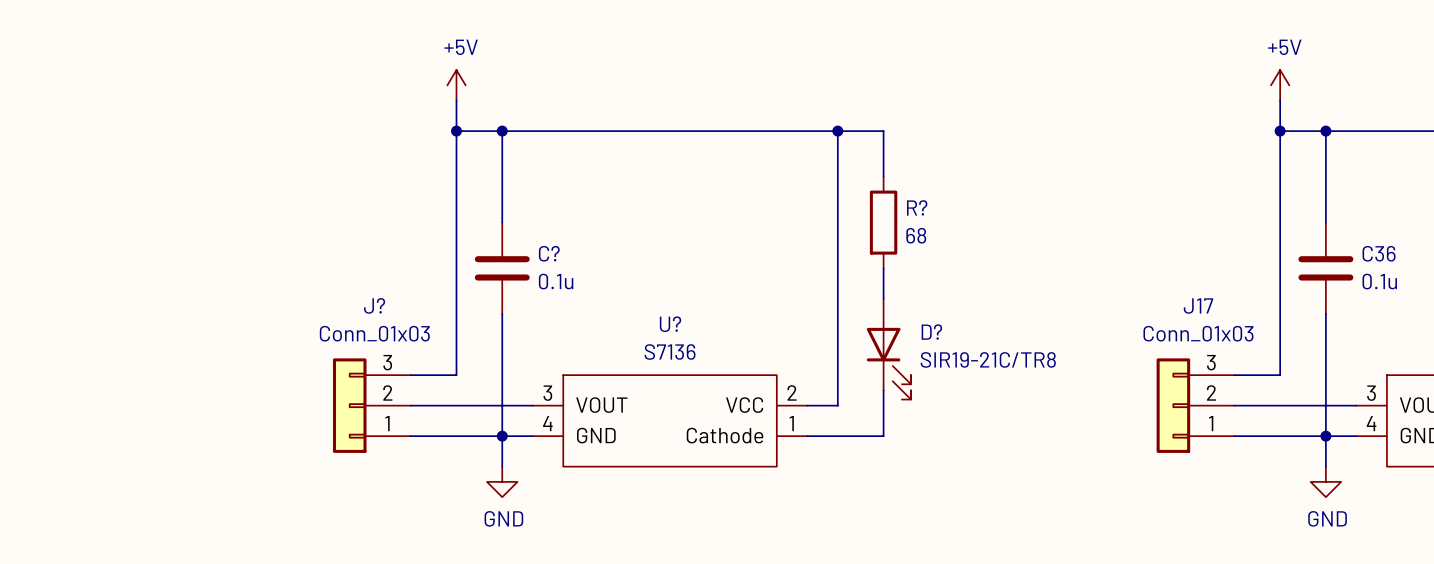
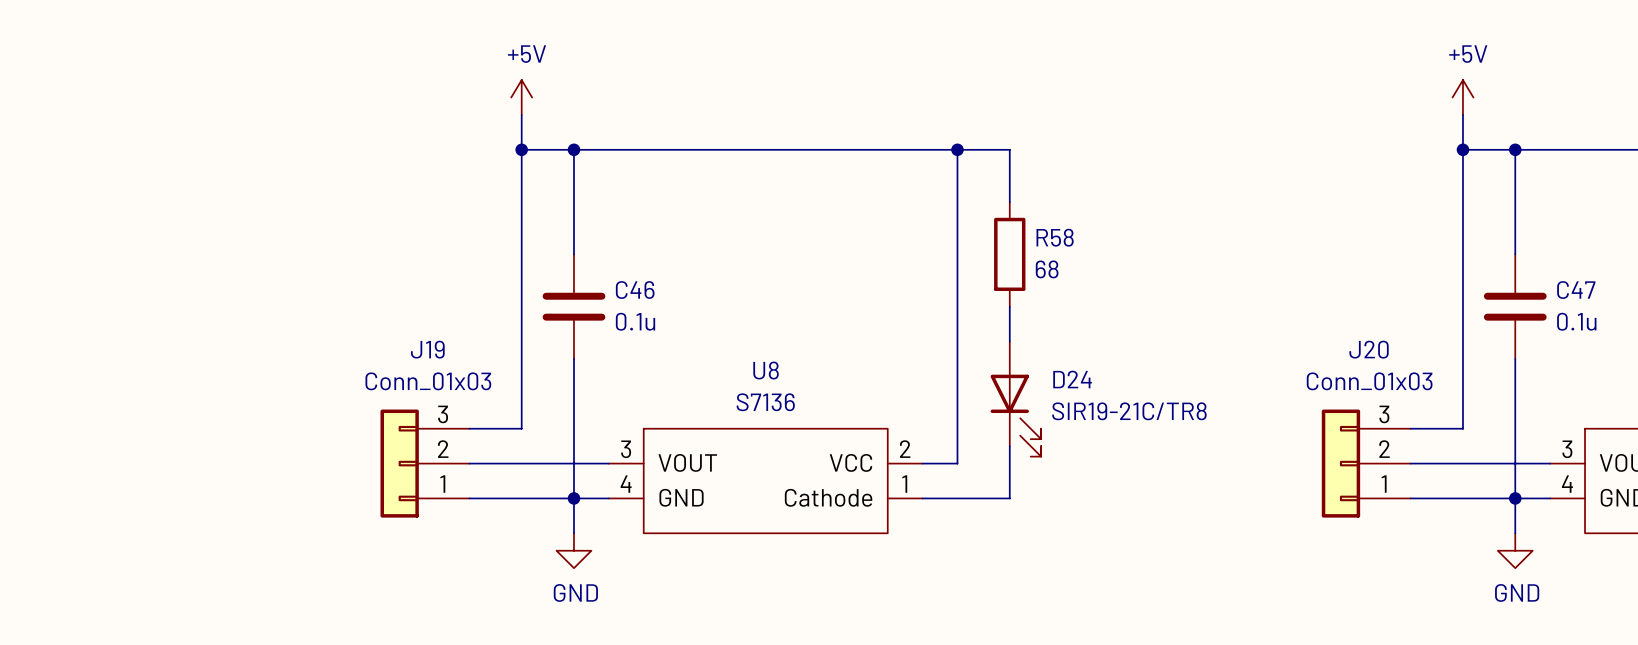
R? name: R? (917, 207) -> R58 (1055, 237)
C? name: C? (549, 253) -> C46 (635, 290)
C36 name: C36 (1379, 253) -> C47 (1576, 290)
J? name: J? (374, 305) -> J19 (427, 349)
J17 name: J17 (1198, 306) -> J20 (1369, 349)
U? name: U? (670, 324) -> U8 (766, 370)
D? name: D? (931, 332) -> D24 (1072, 379)

